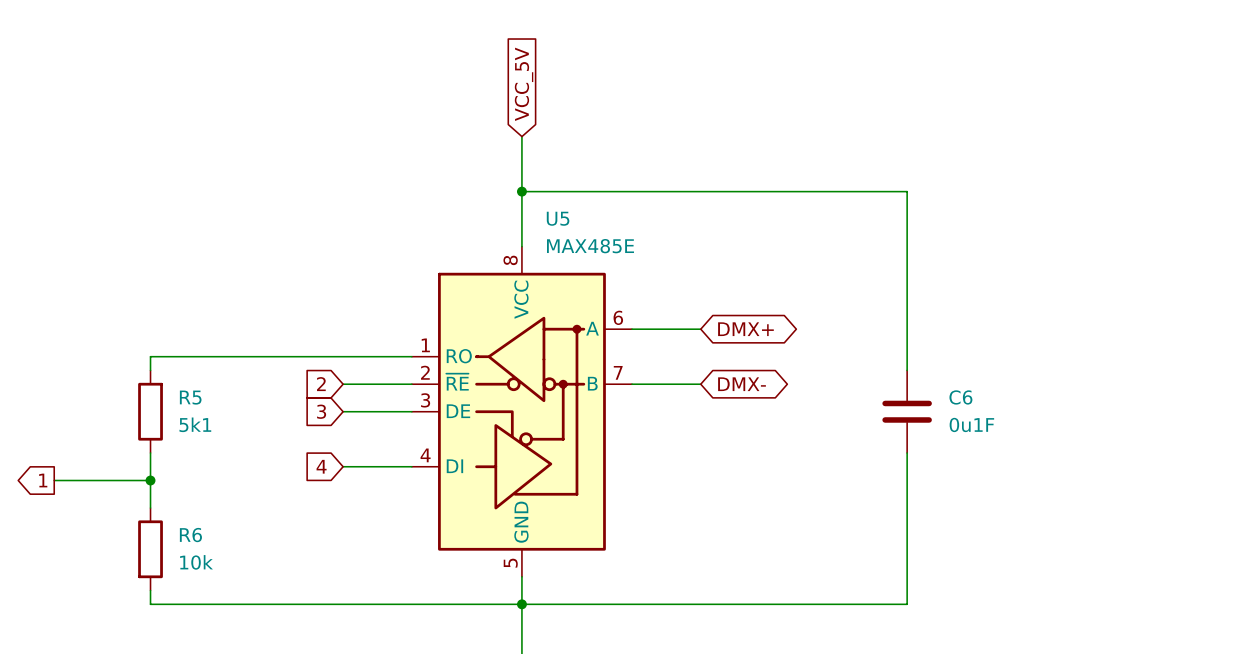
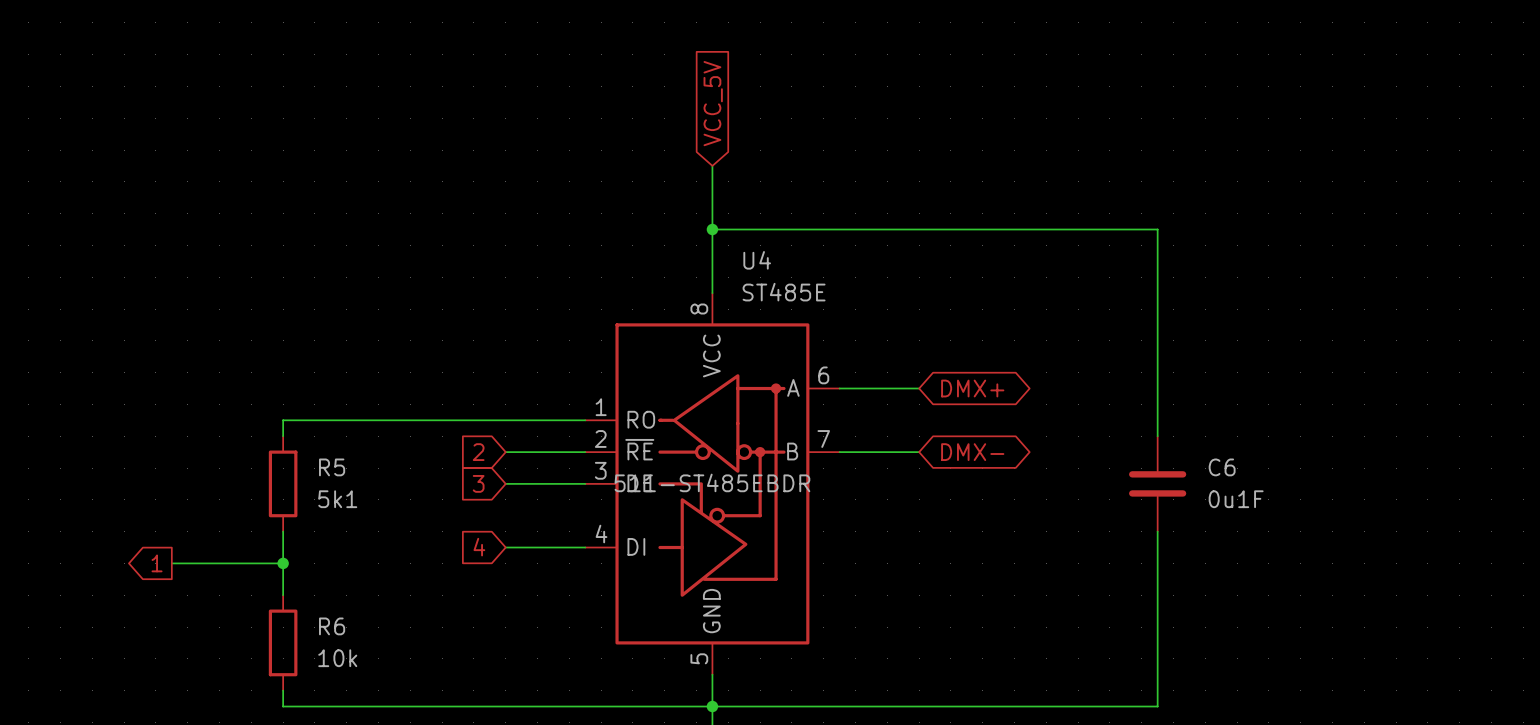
U5 name: U5 (558, 218) -> U4 (757, 260)
U5 value: MAX485E (590, 246) -> ST485E (784, 292)
U5 text: none -> 511-ST485EBDR (712, 482)

